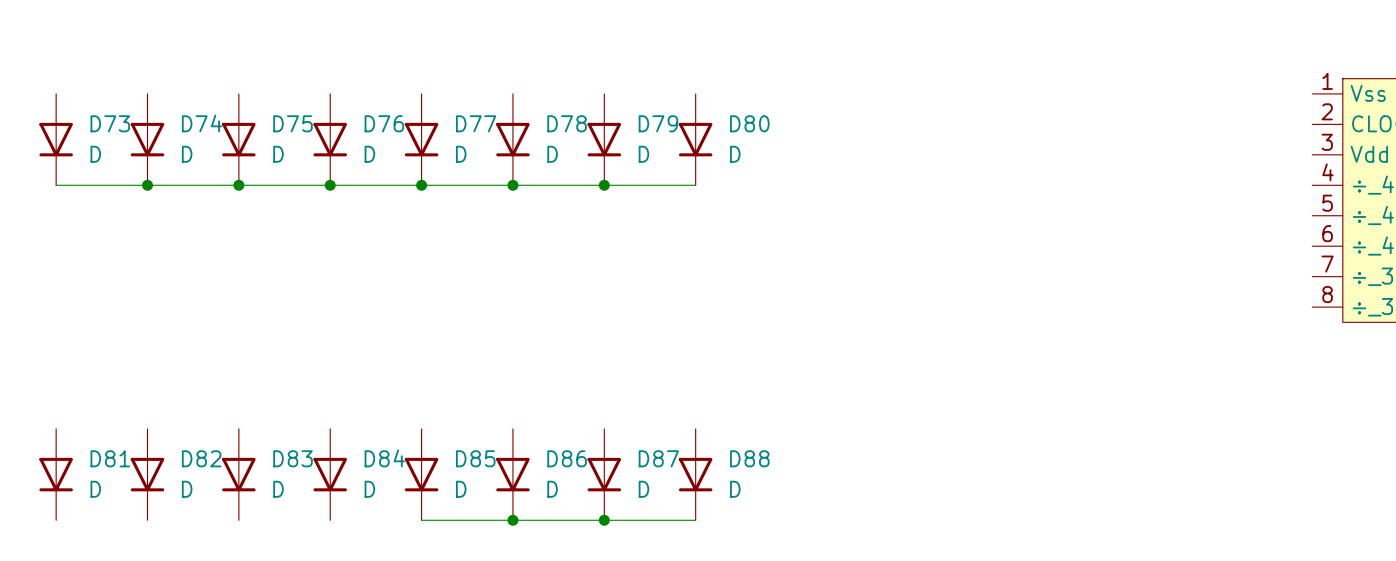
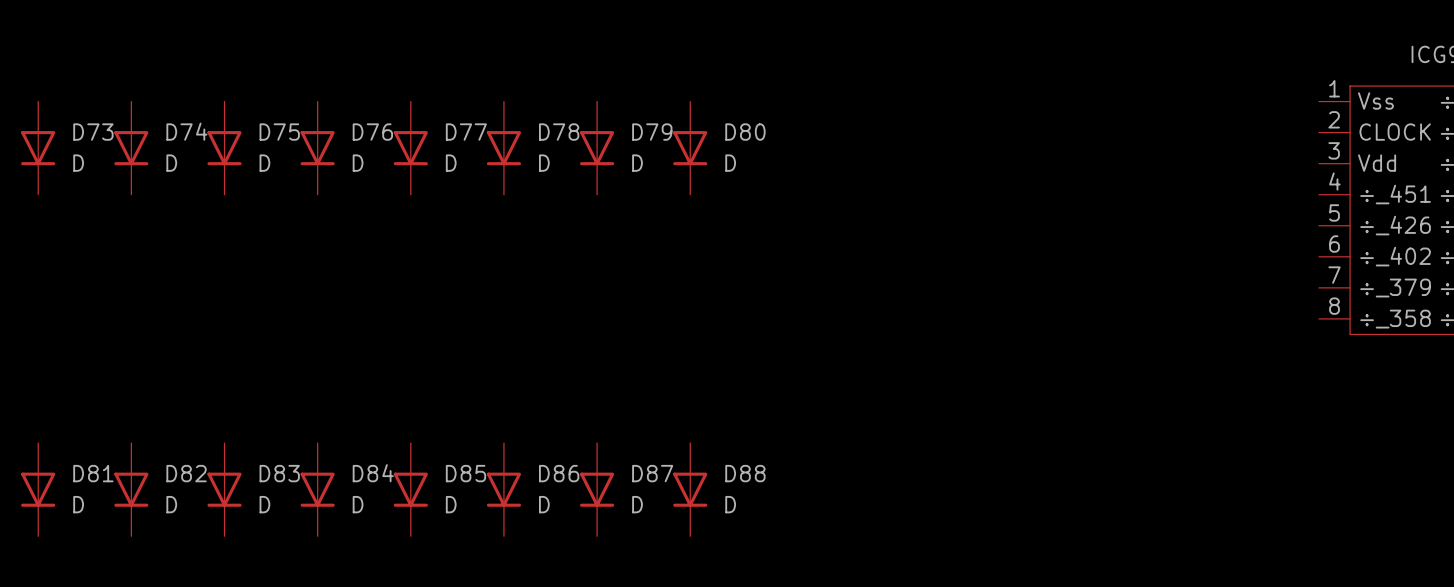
wire: (56, 185) (695, 185) -> none
junction: (147, 185) -> none
junction: (238, 185) -> none
junction: (330, 185) -> none
junction: (421, 185) -> none
junction: (512, 185) -> none
junction: (604, 185) -> none
wire: (421, 520) (695, 520) -> none
junction: (512, 520) -> none
junction: (604, 520) -> none

